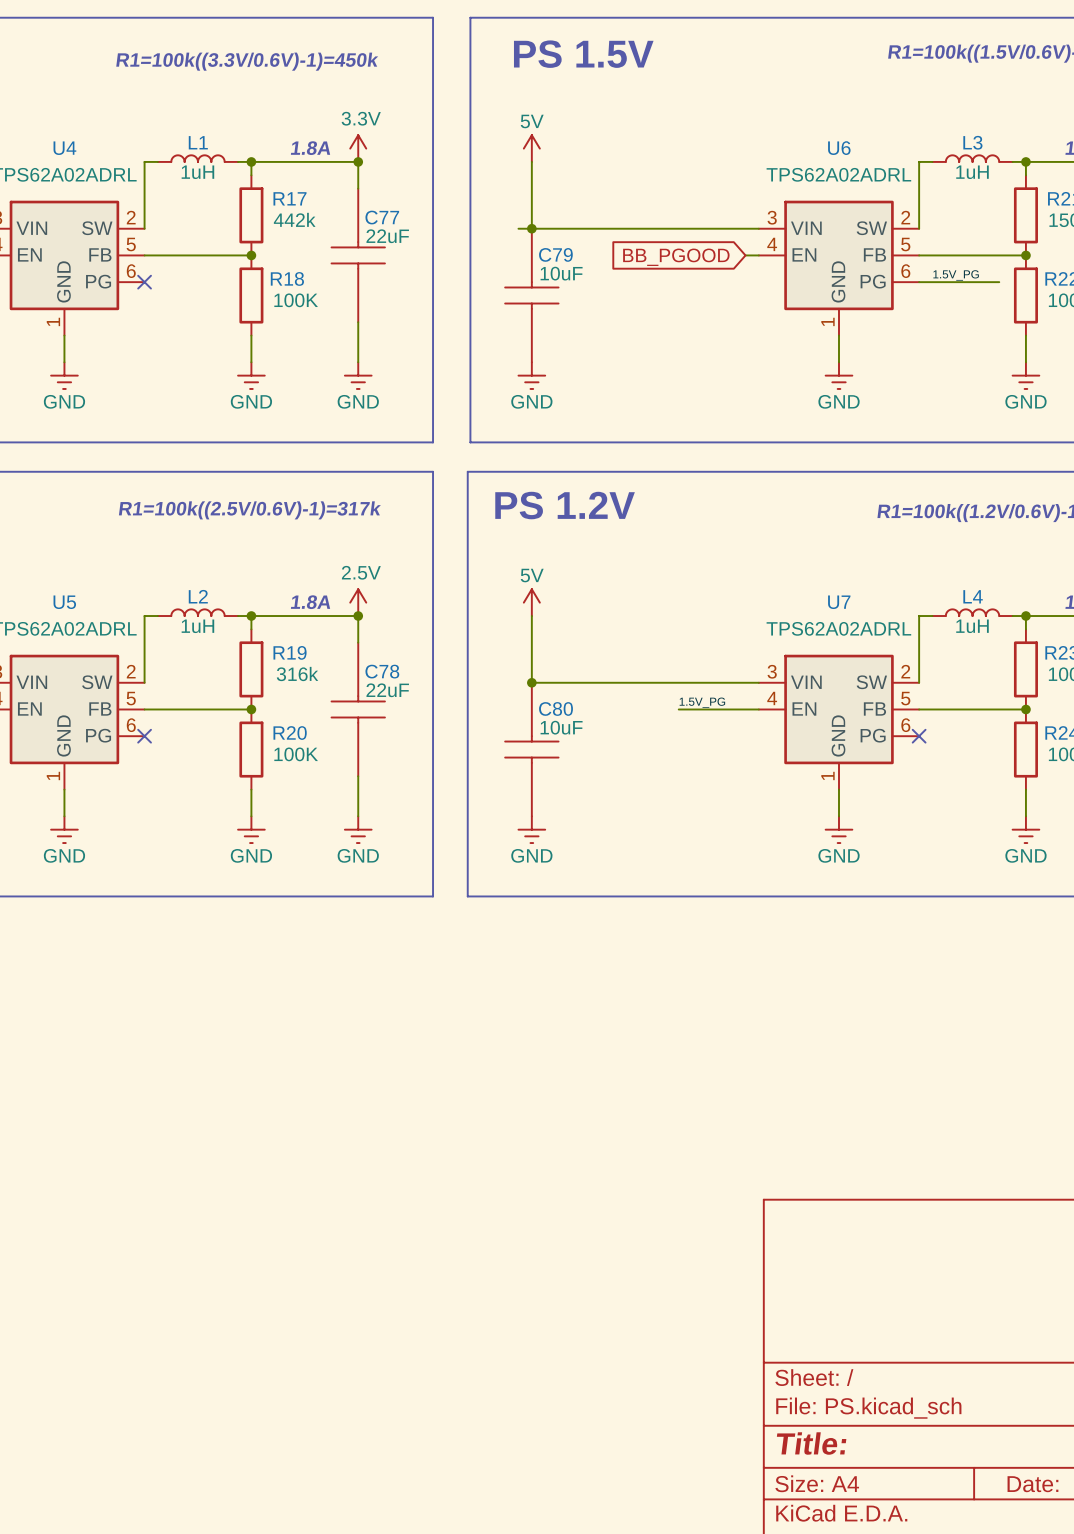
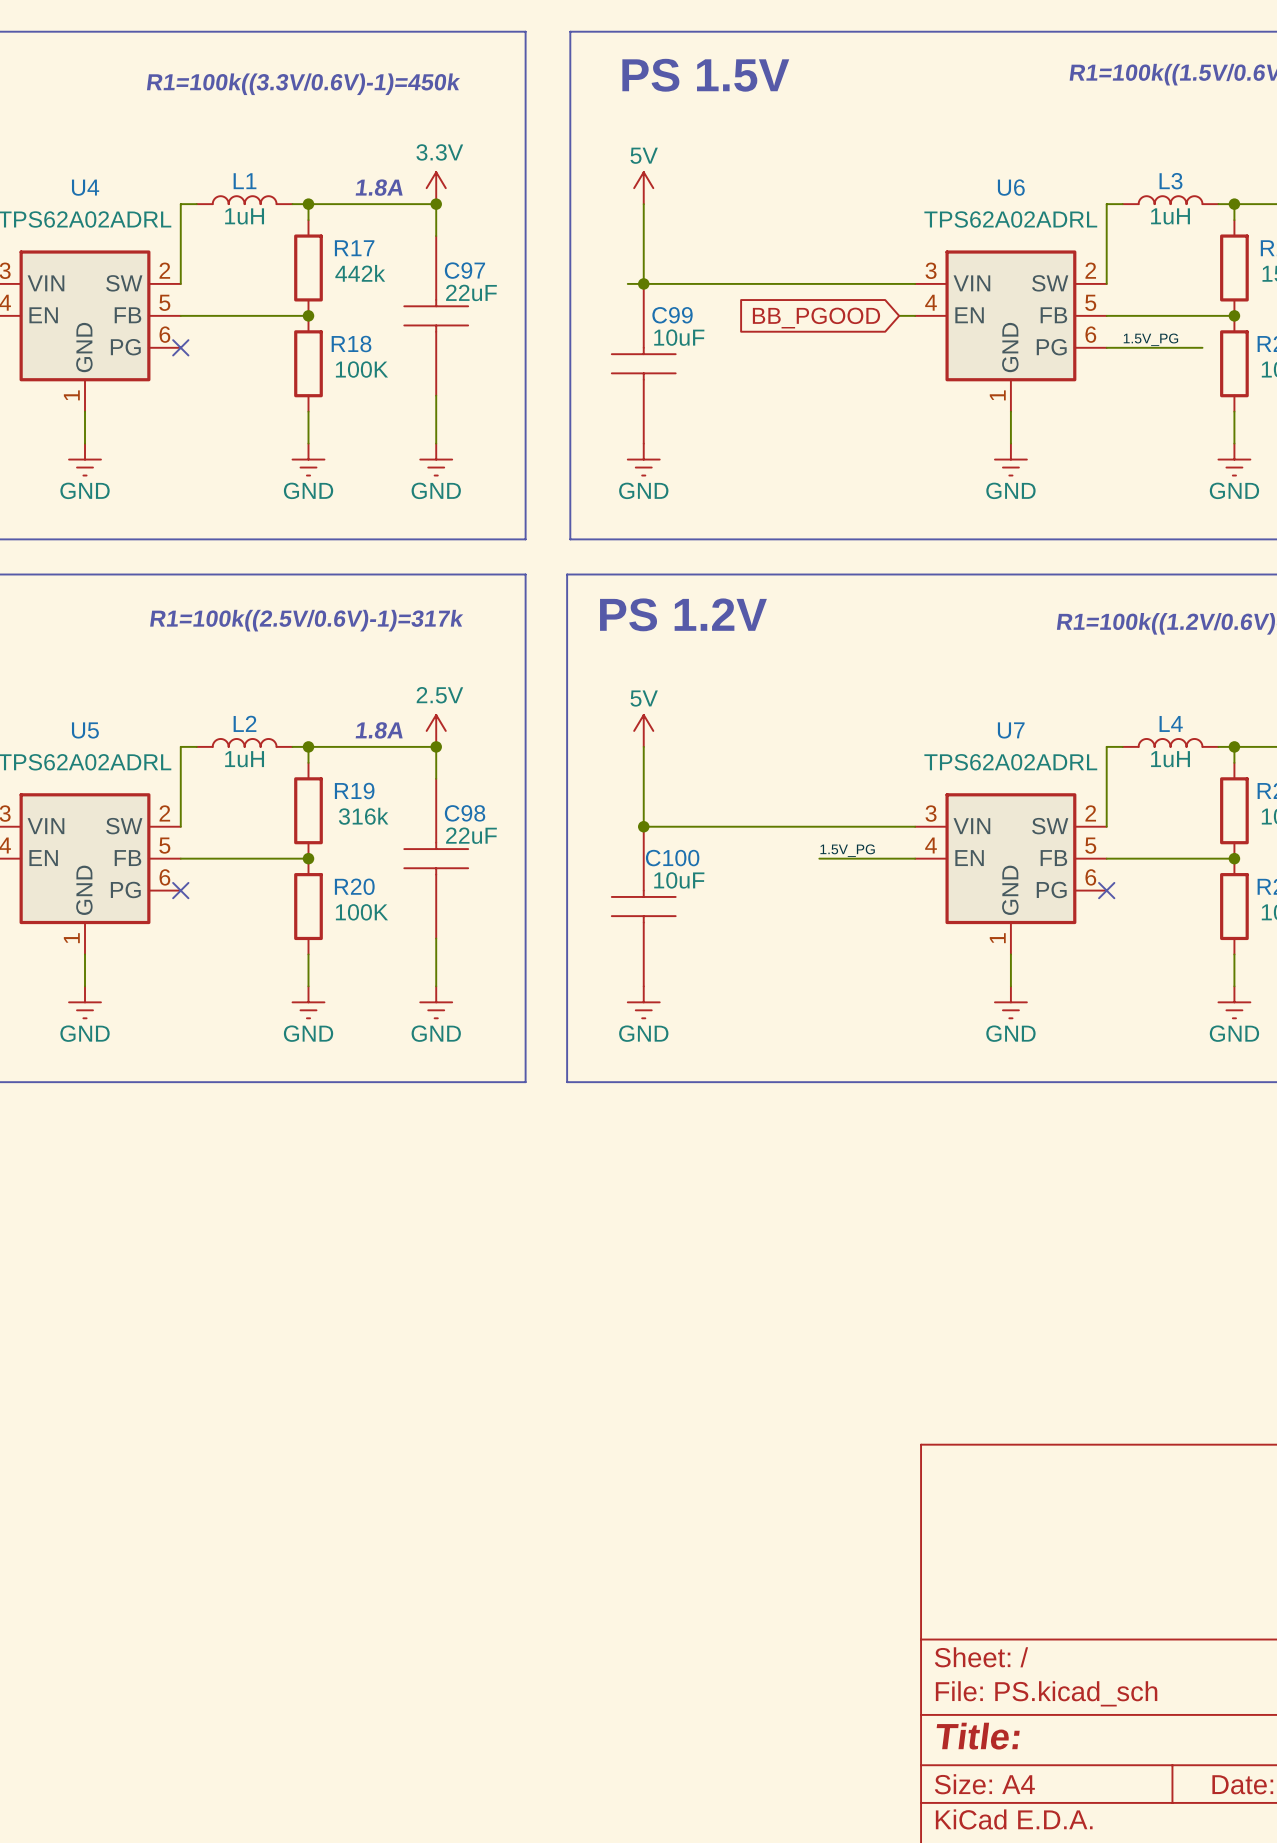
C77 name: C77 (382, 217) -> C97 (464, 270)
C79 name: C79 (555, 254) -> C99 (672, 315)
C78 name: C78 (382, 671) -> C98 (465, 813)
C80 name: C80 (556, 708) -> C100 (672, 858)

